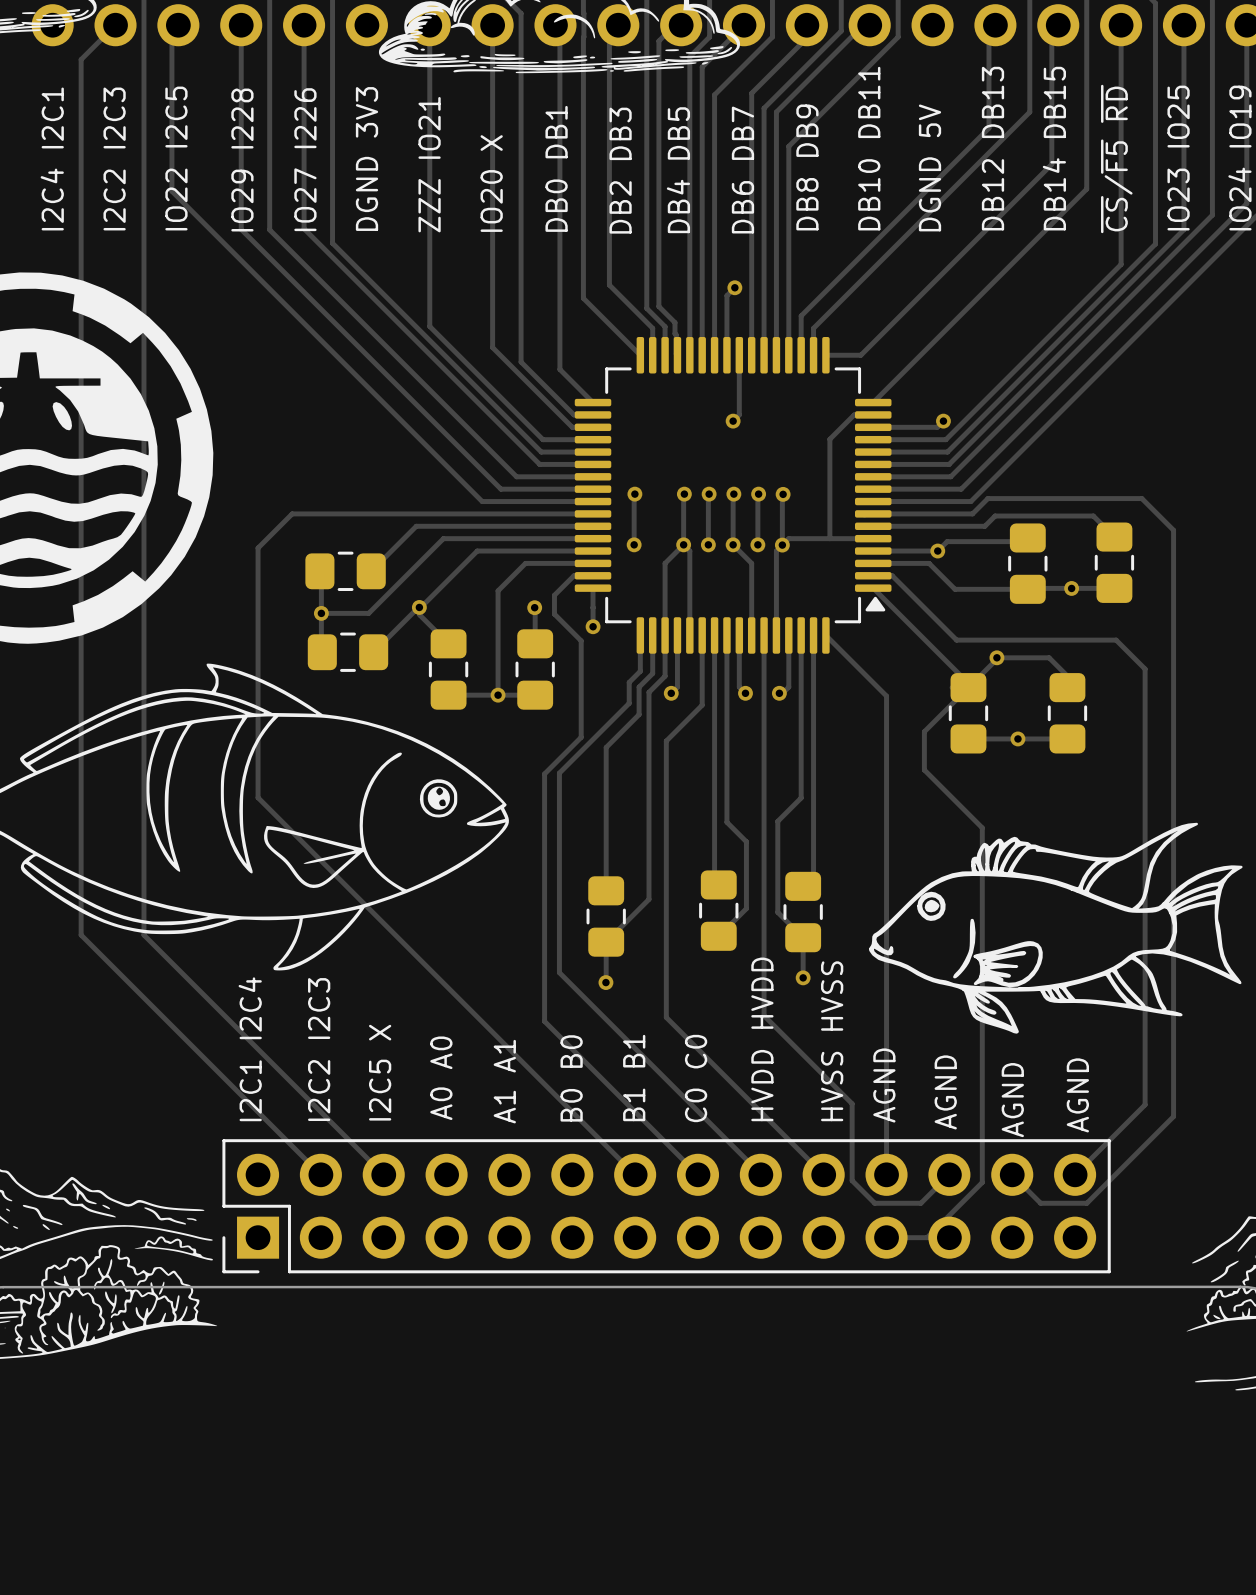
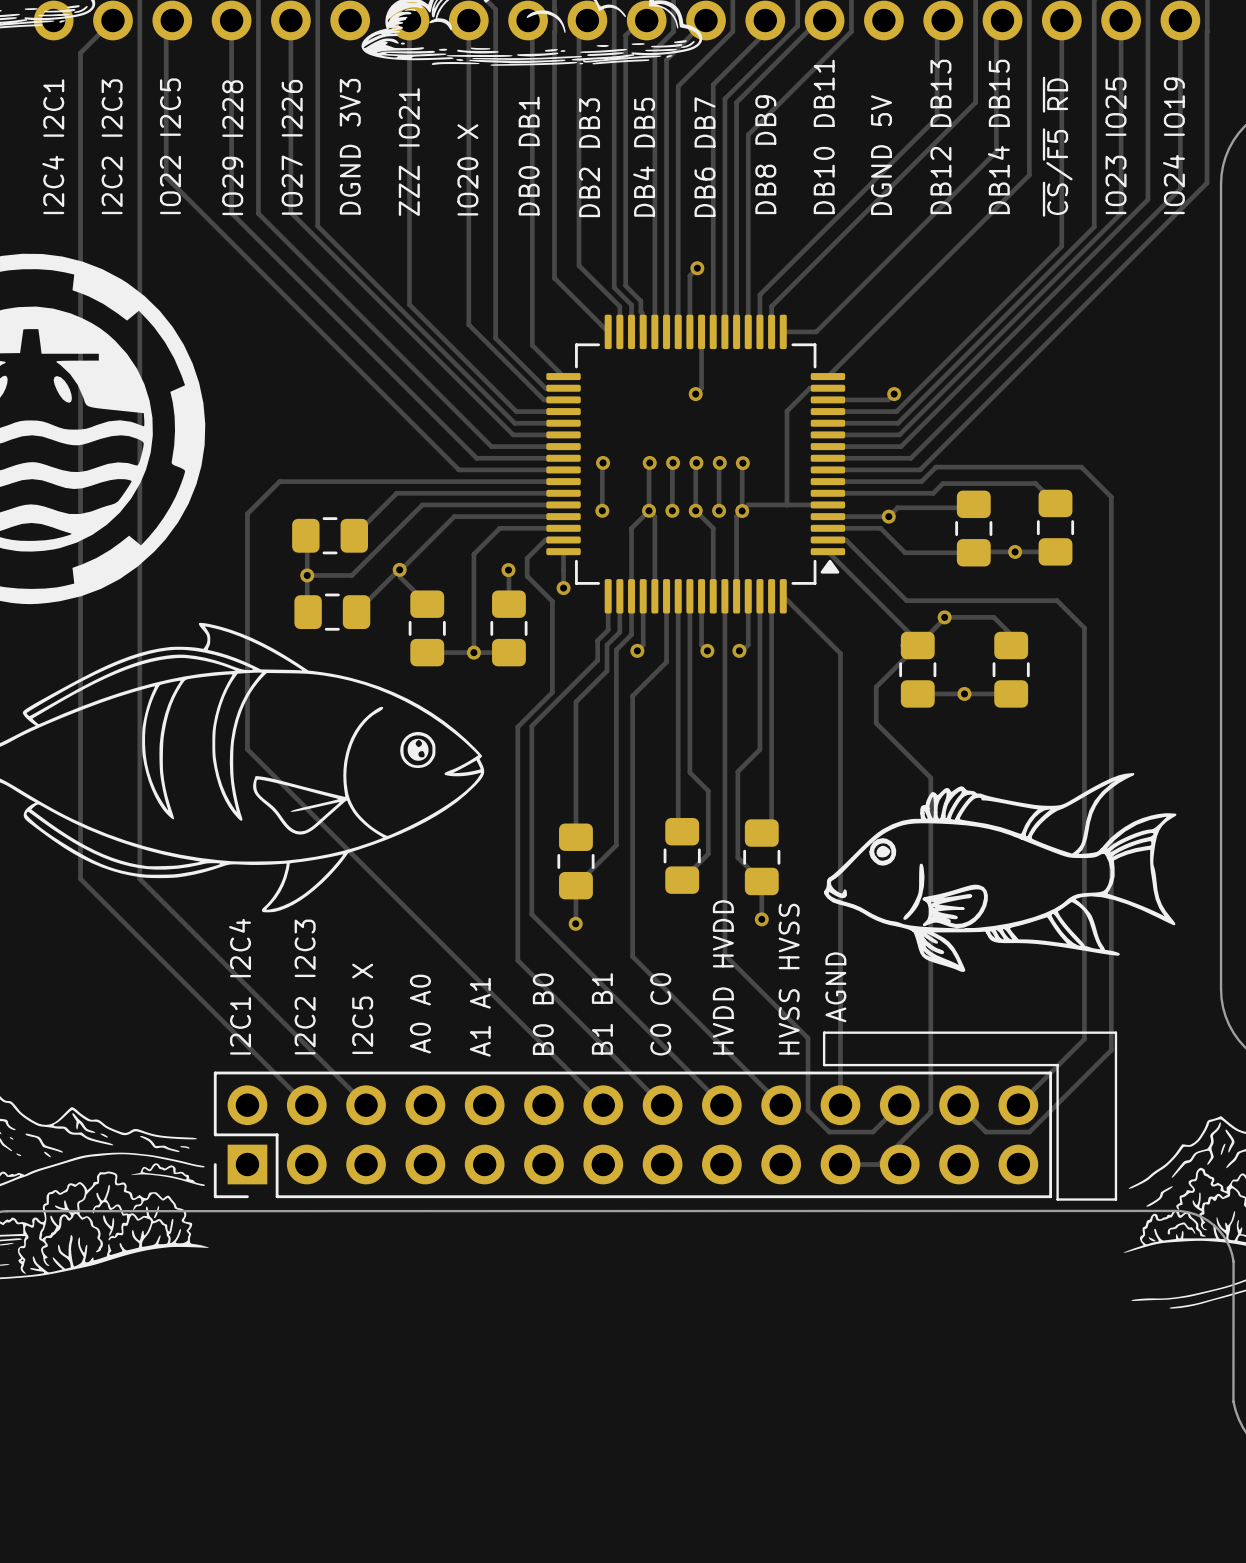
text position: AGND (884, 1085) -> AGND (835, 987)
text: AGND (945, 1092) -> none
text: AGND (1077, 1095) -> none
line: none -> (824, 1032) (1115, 1032) (1115, 1199) (1057, 1199) (1057, 1065) (824, 1065) (824, 1032)
text: AGND (1012, 1100) -> none

